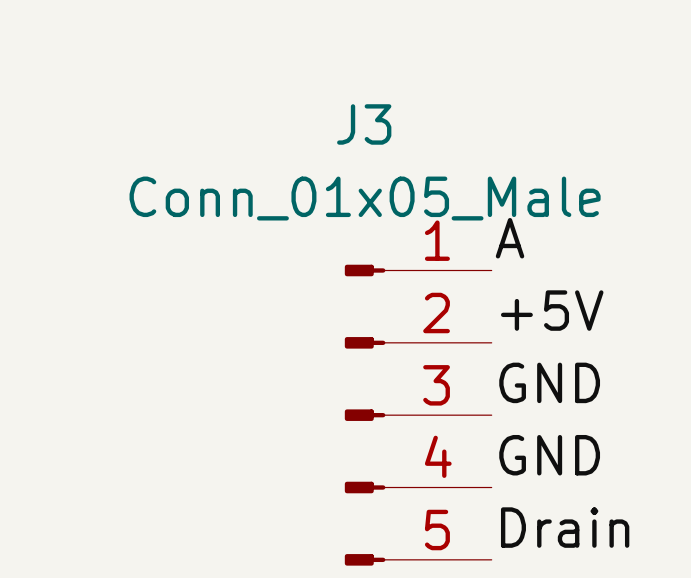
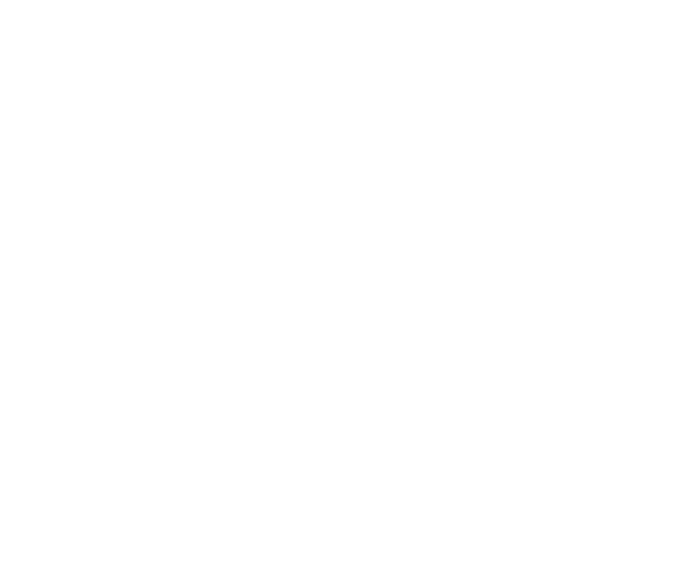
label: A (510, 238) -> none
label: +5V (552, 310) -> none
label: GND (549, 382) -> none
J3: Conn_01x05_Male (418, 415) -> none
label: GND (549, 455) -> none
label: Drain (565, 527) -> none

